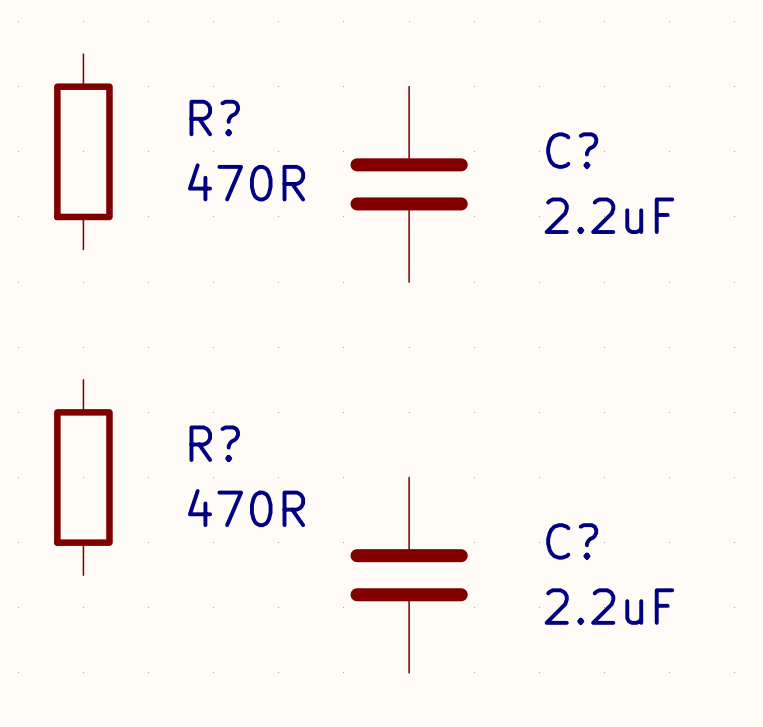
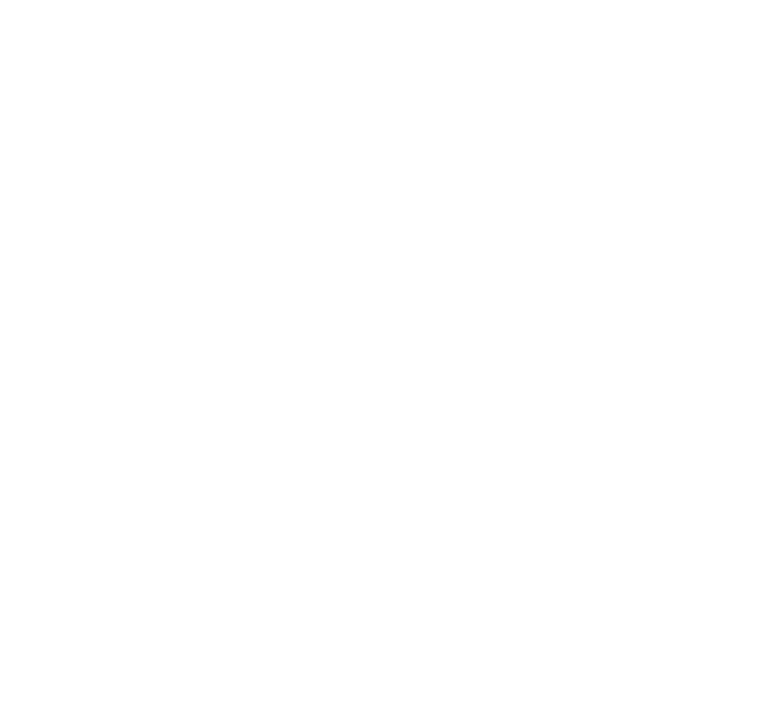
R?: 470R (83, 151) -> none
C?: 2.2uF (409, 184) -> none
R?: 470R (83, 477) -> none
C?: 2.2uF (409, 575) -> none

